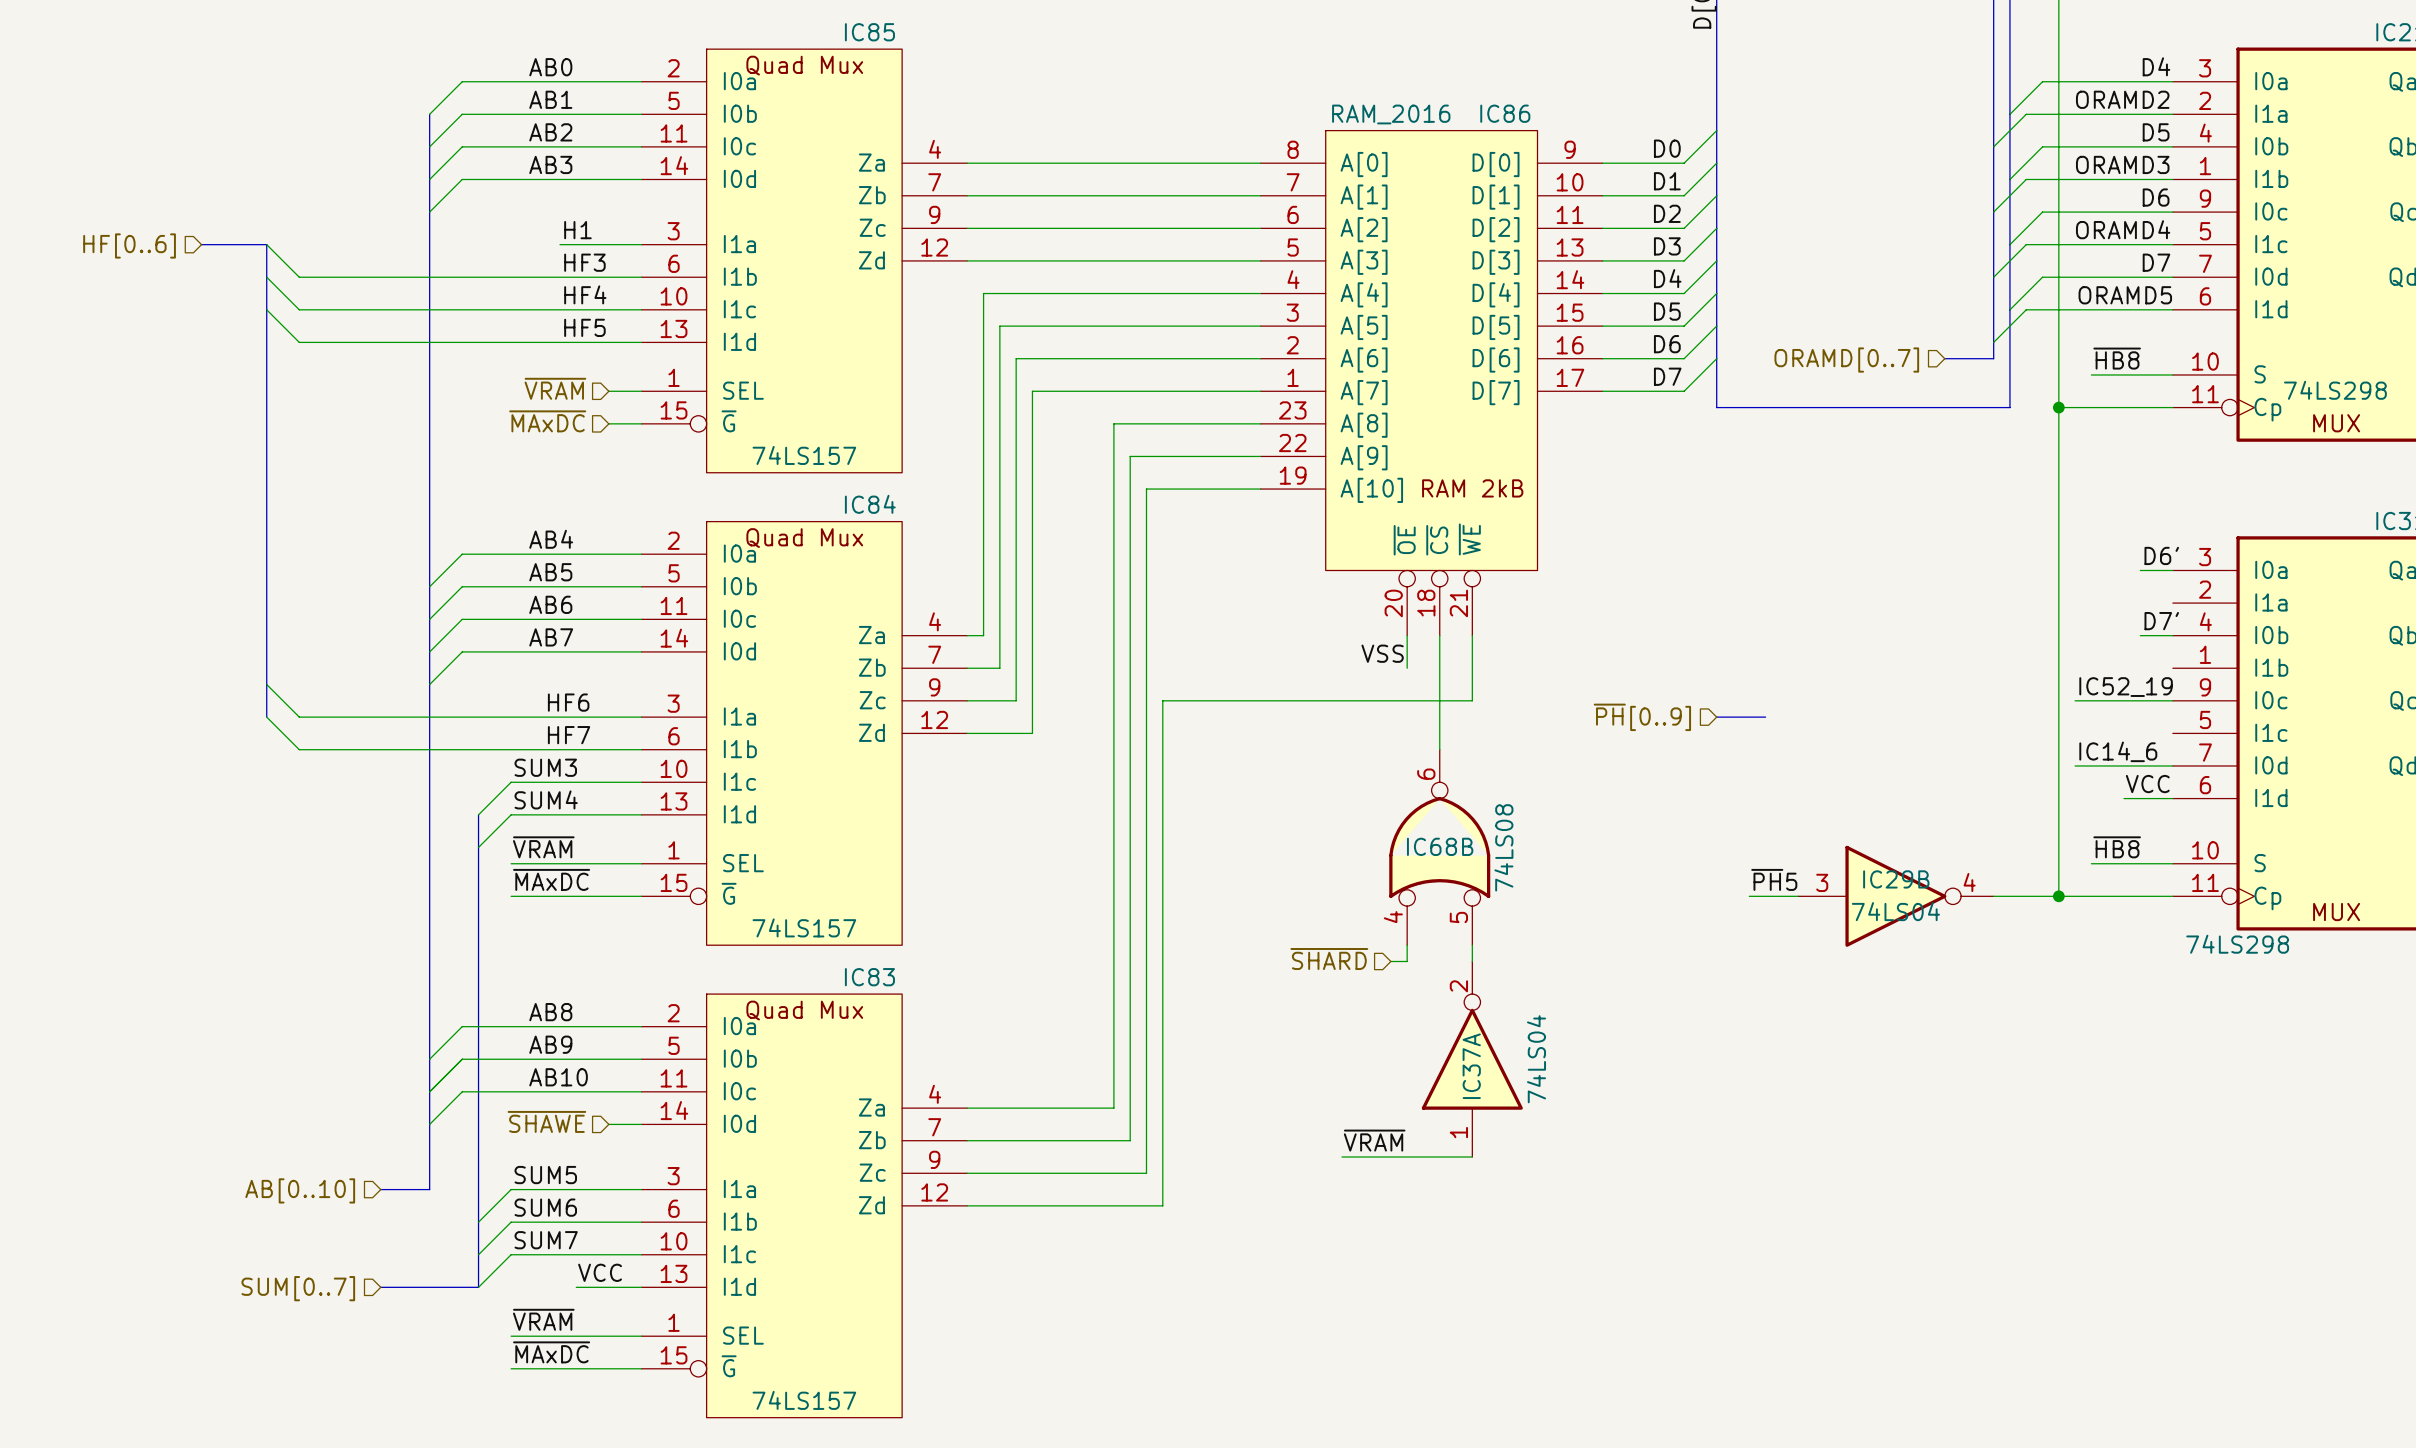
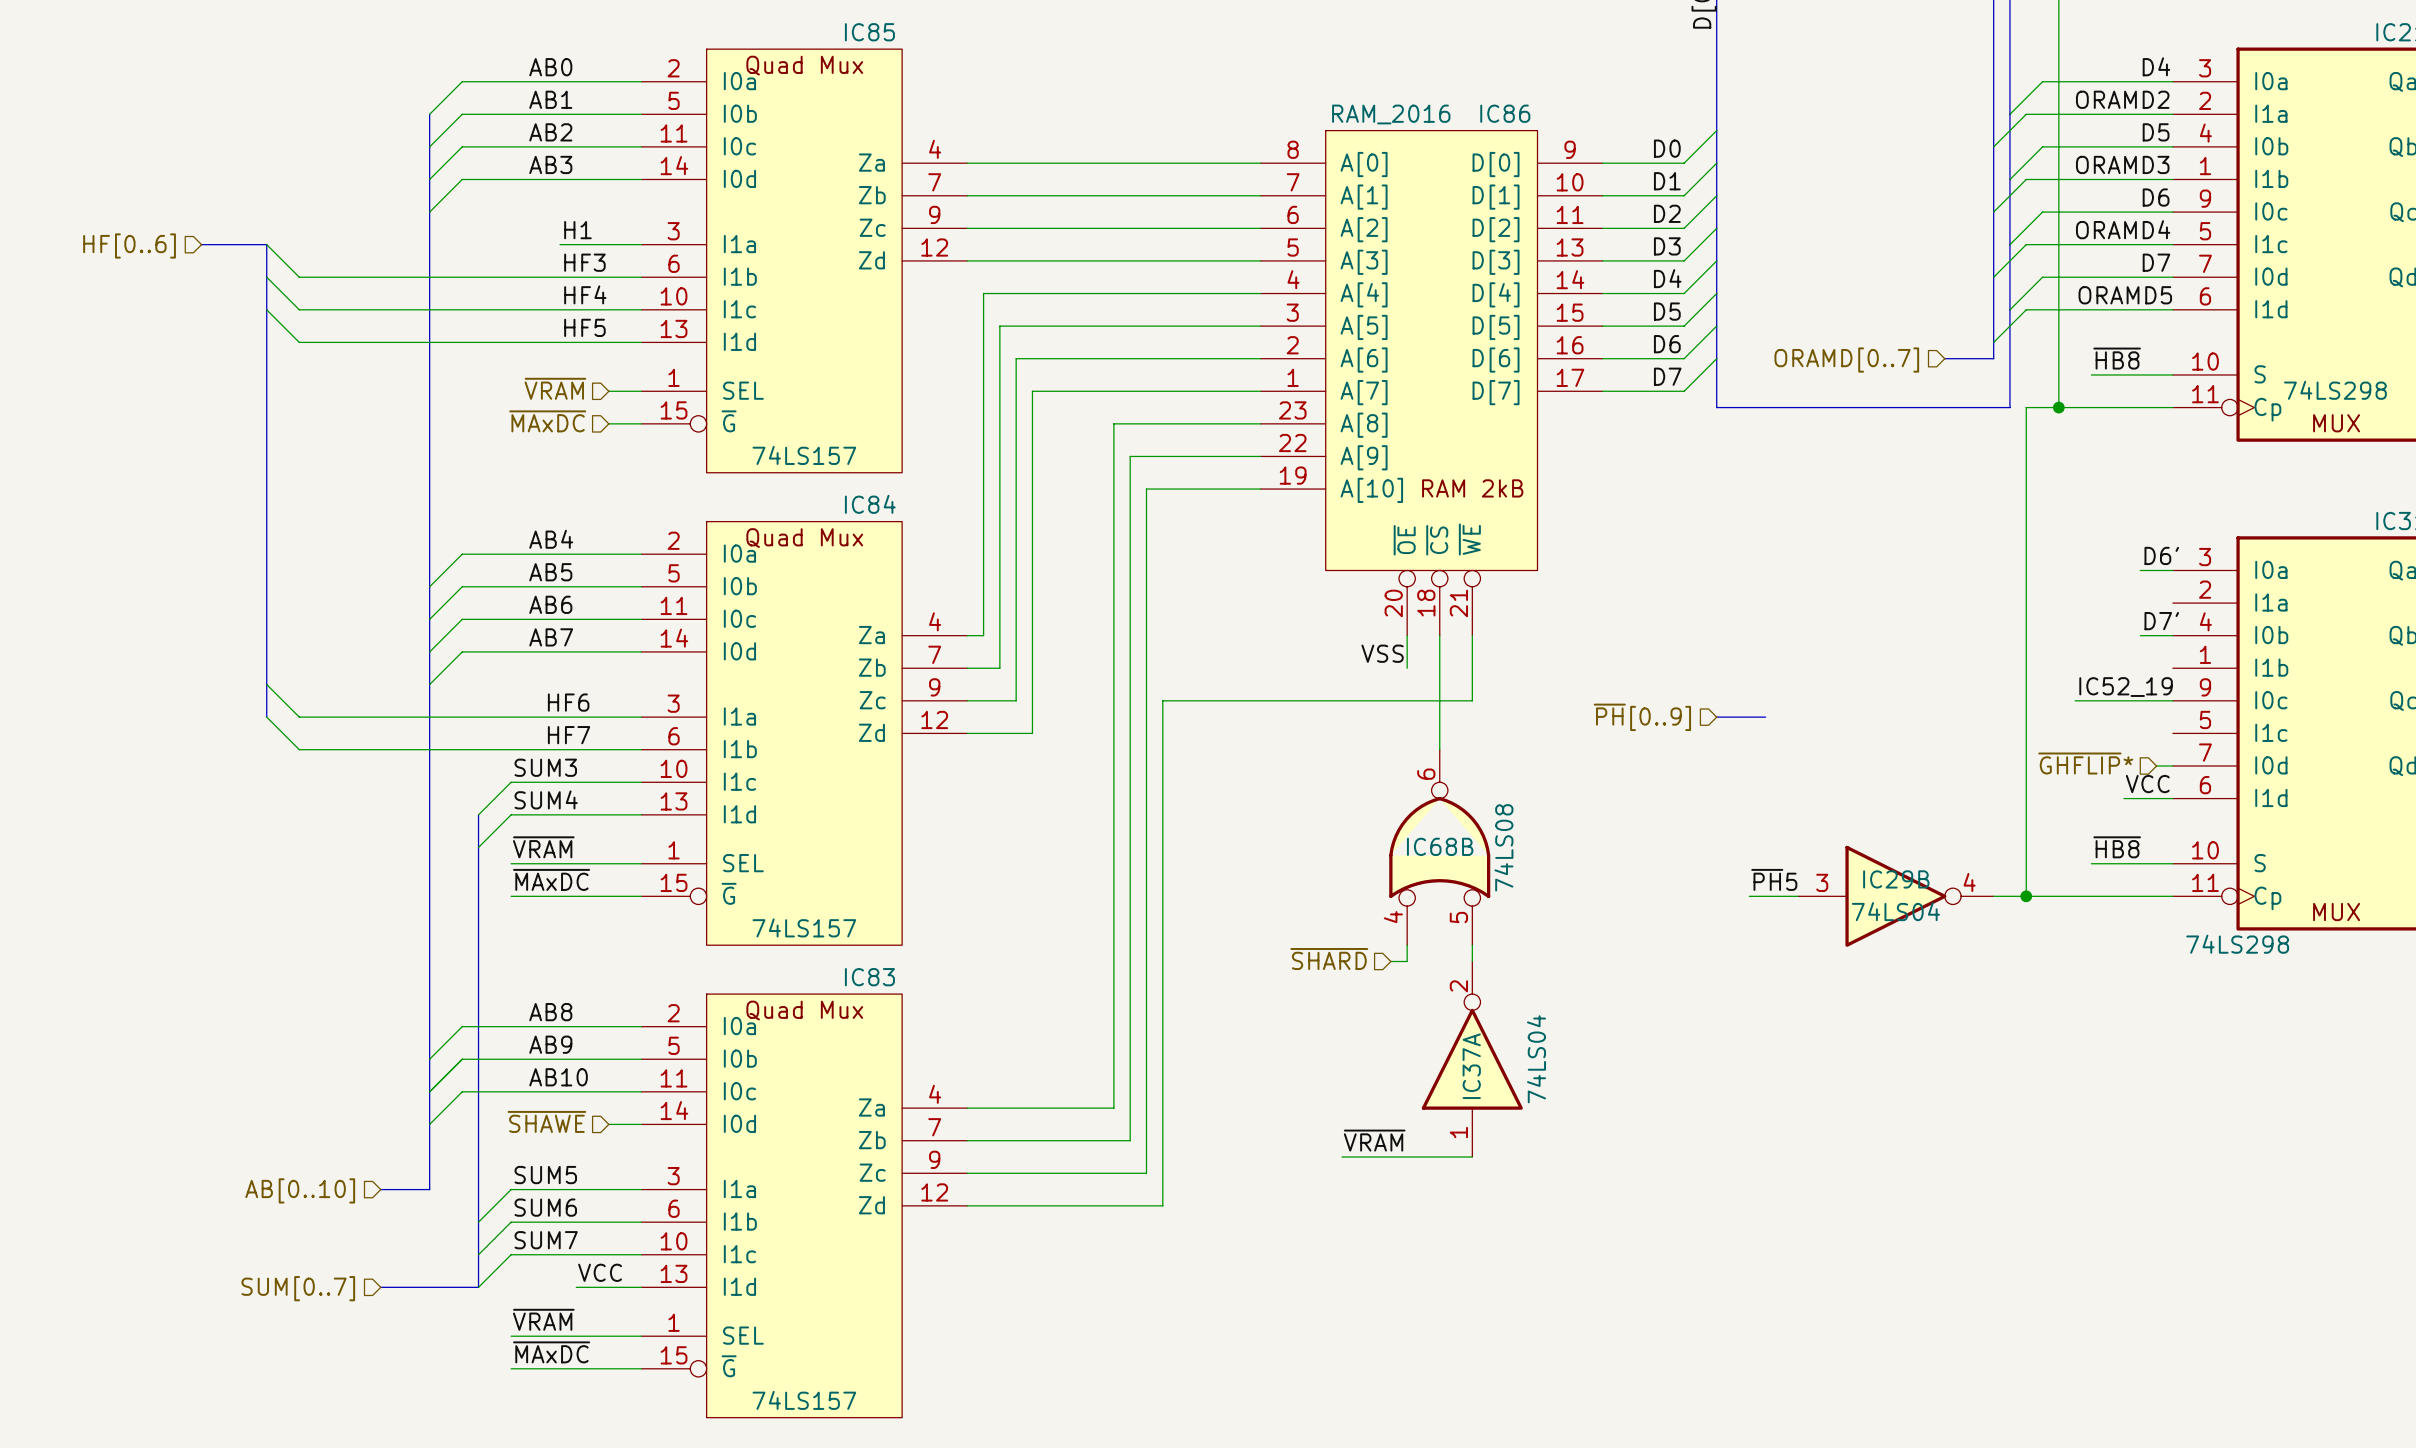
wire: (2058, 407) (2058, 896) -> (2058, 407) (2026, 407) (2026, 896)
label: IC14_6 (2118, 751) -> none
hierarchical label: none -> ~{GHFLIP}* (2085, 763)
wire: (2075, 765) (2156, 765) -> none
junction position: (2058, 896) -> (2026, 896)

